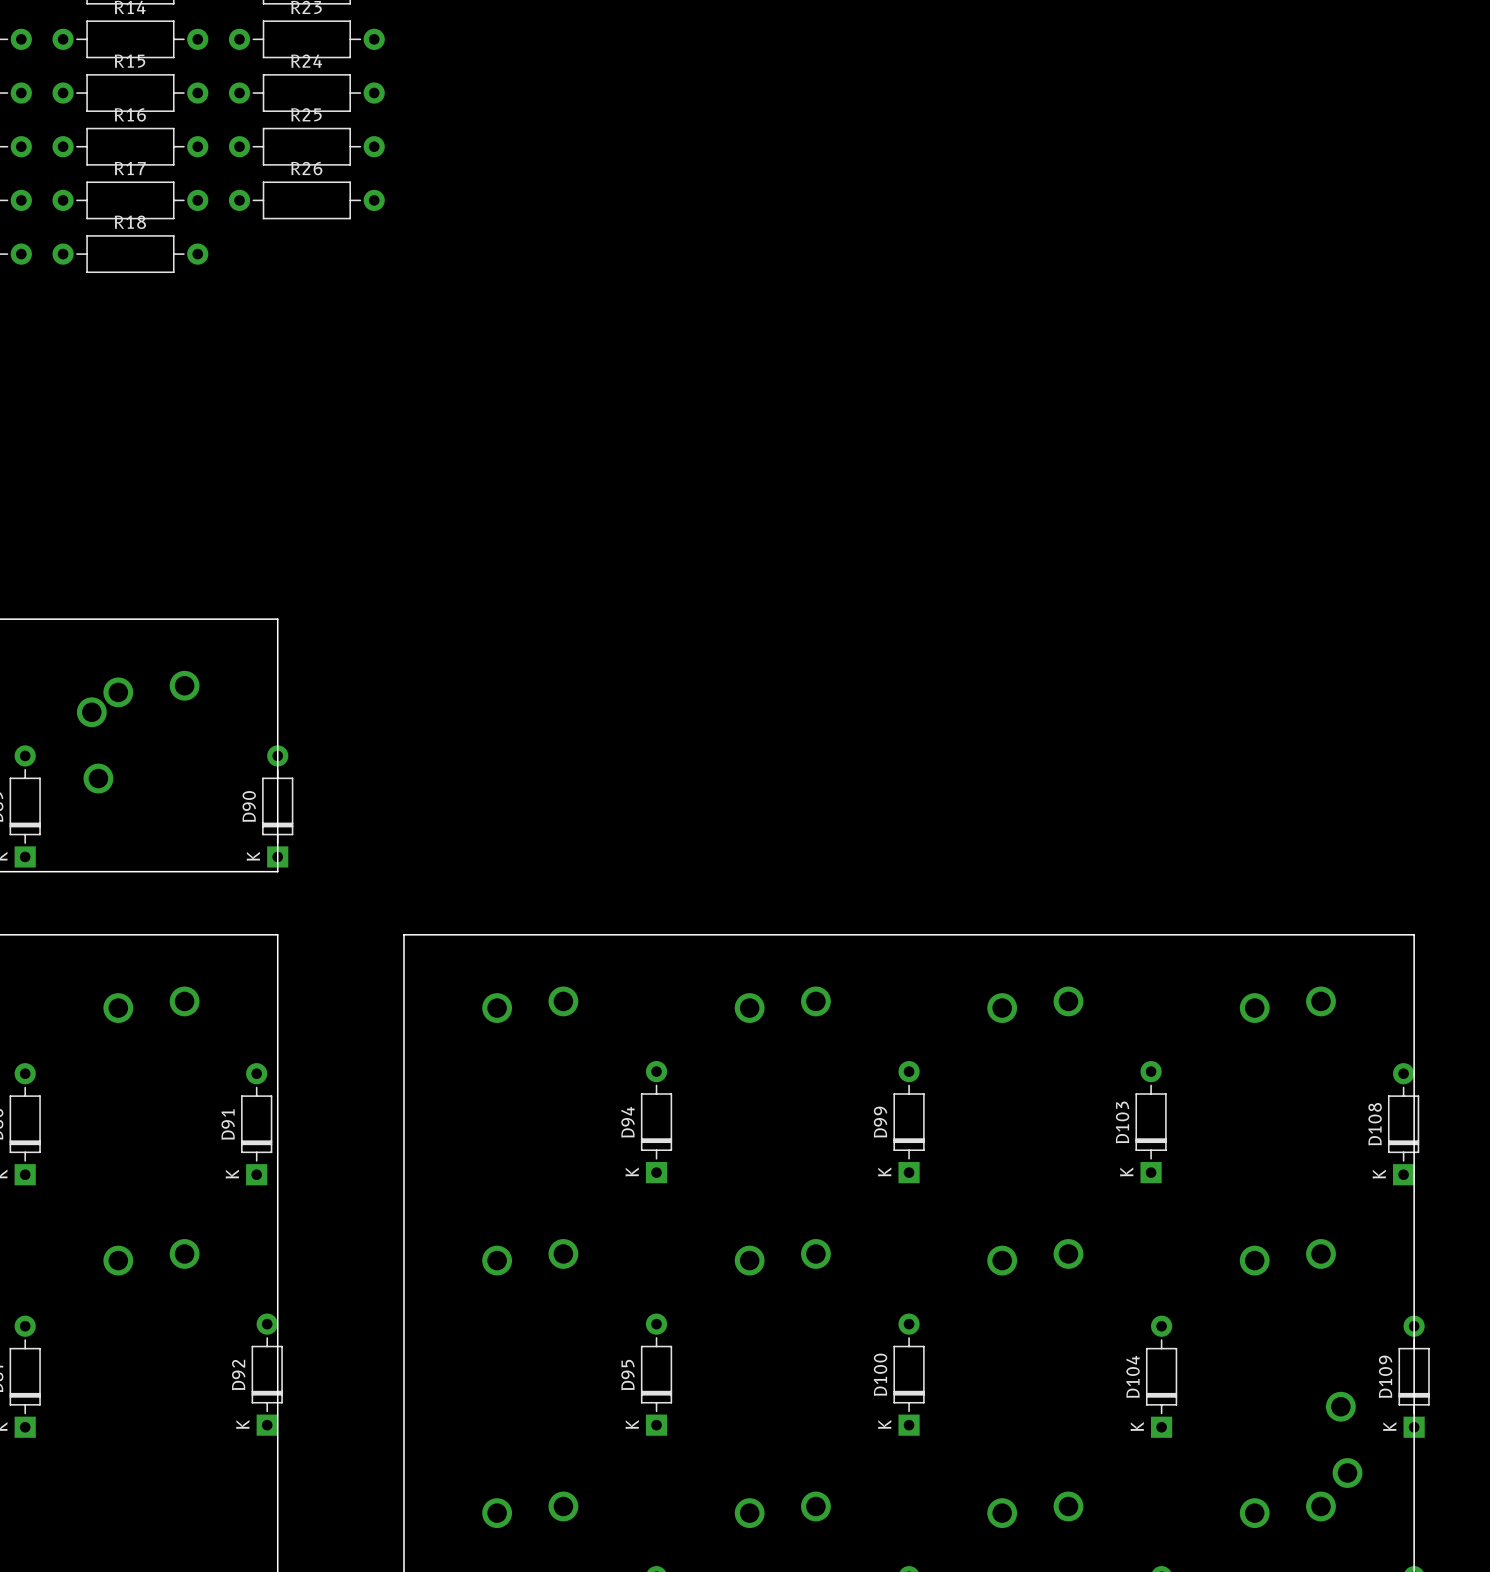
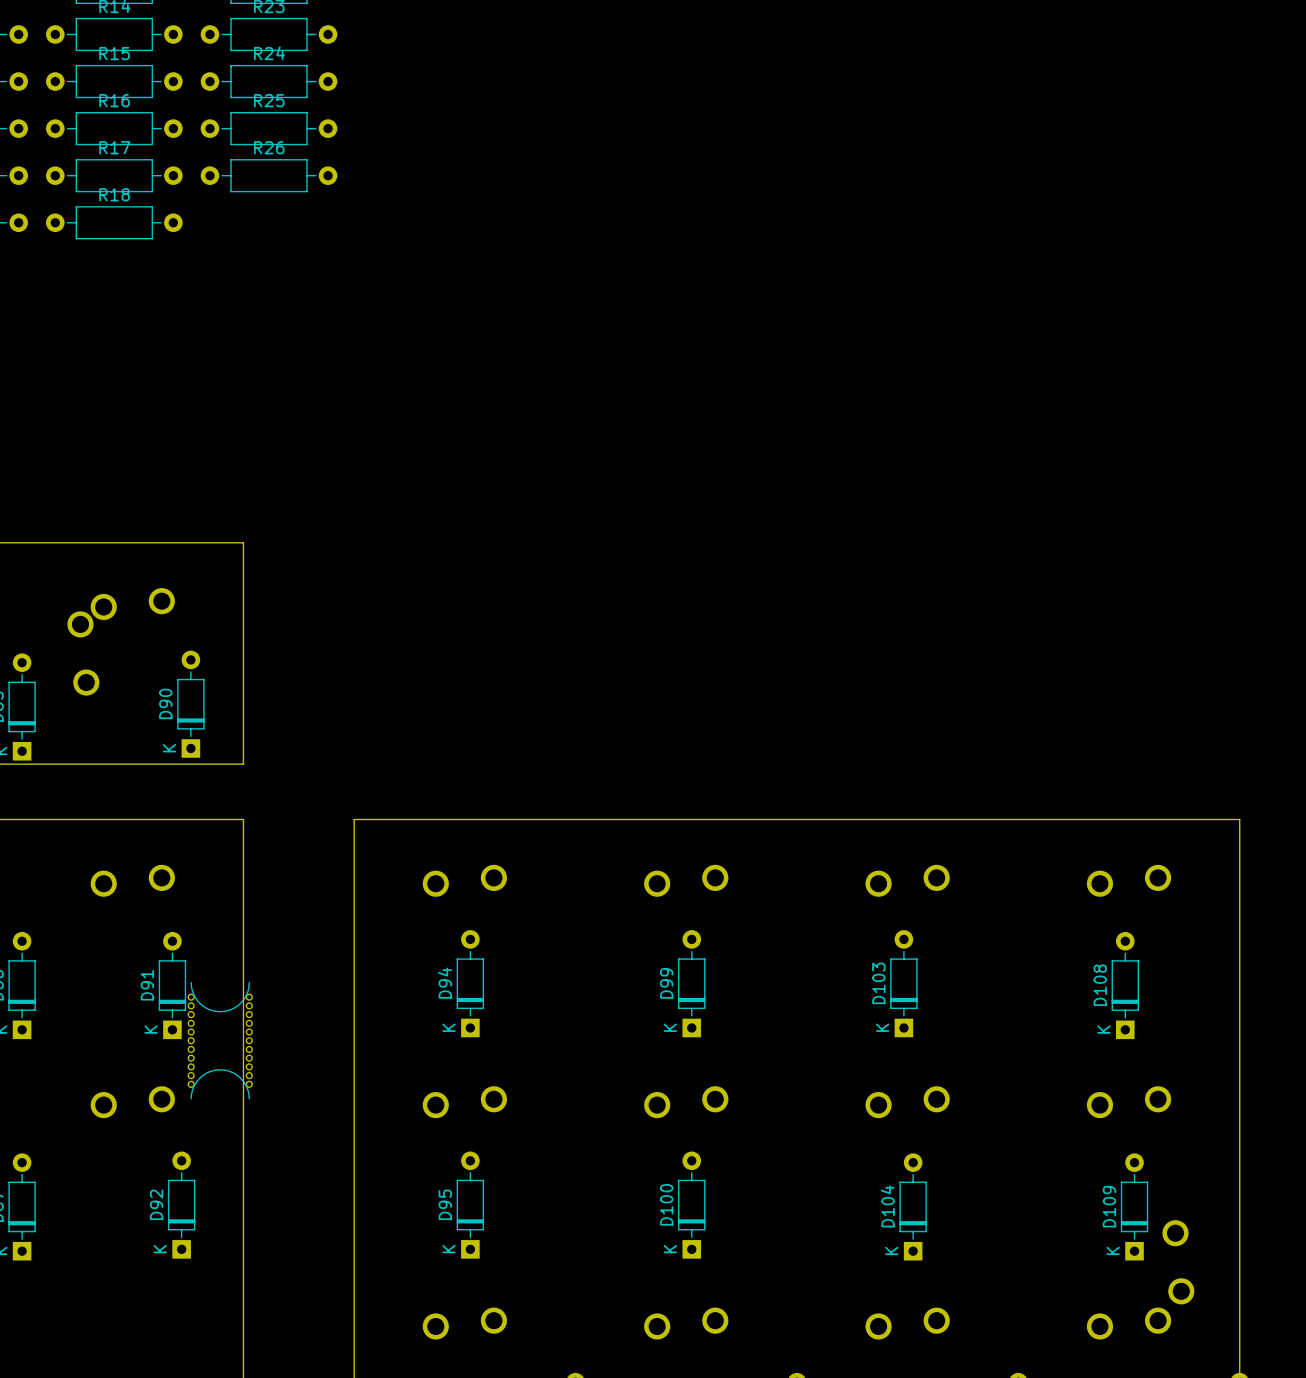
D90 position: (277, 806) -> (190, 704)
D94 position: (656, 1122) -> (470, 983)
D99 position: (909, 1122) -> (691, 983)
D103 position: (1151, 1122) -> (903, 983)
D91 position: (256, 1124) -> (172, 985)
D108 position: (1403, 1124) -> (1125, 985)
part: none -> (220, 1040)
D92 position: (267, 1374) -> (181, 1205)
D95 position: (656, 1374) -> (470, 1205)
D100 position: (909, 1374) -> (691, 1205)
D104 position: (1161, 1376) -> (913, 1206)
D109 position: (1414, 1376) -> (1134, 1206)

